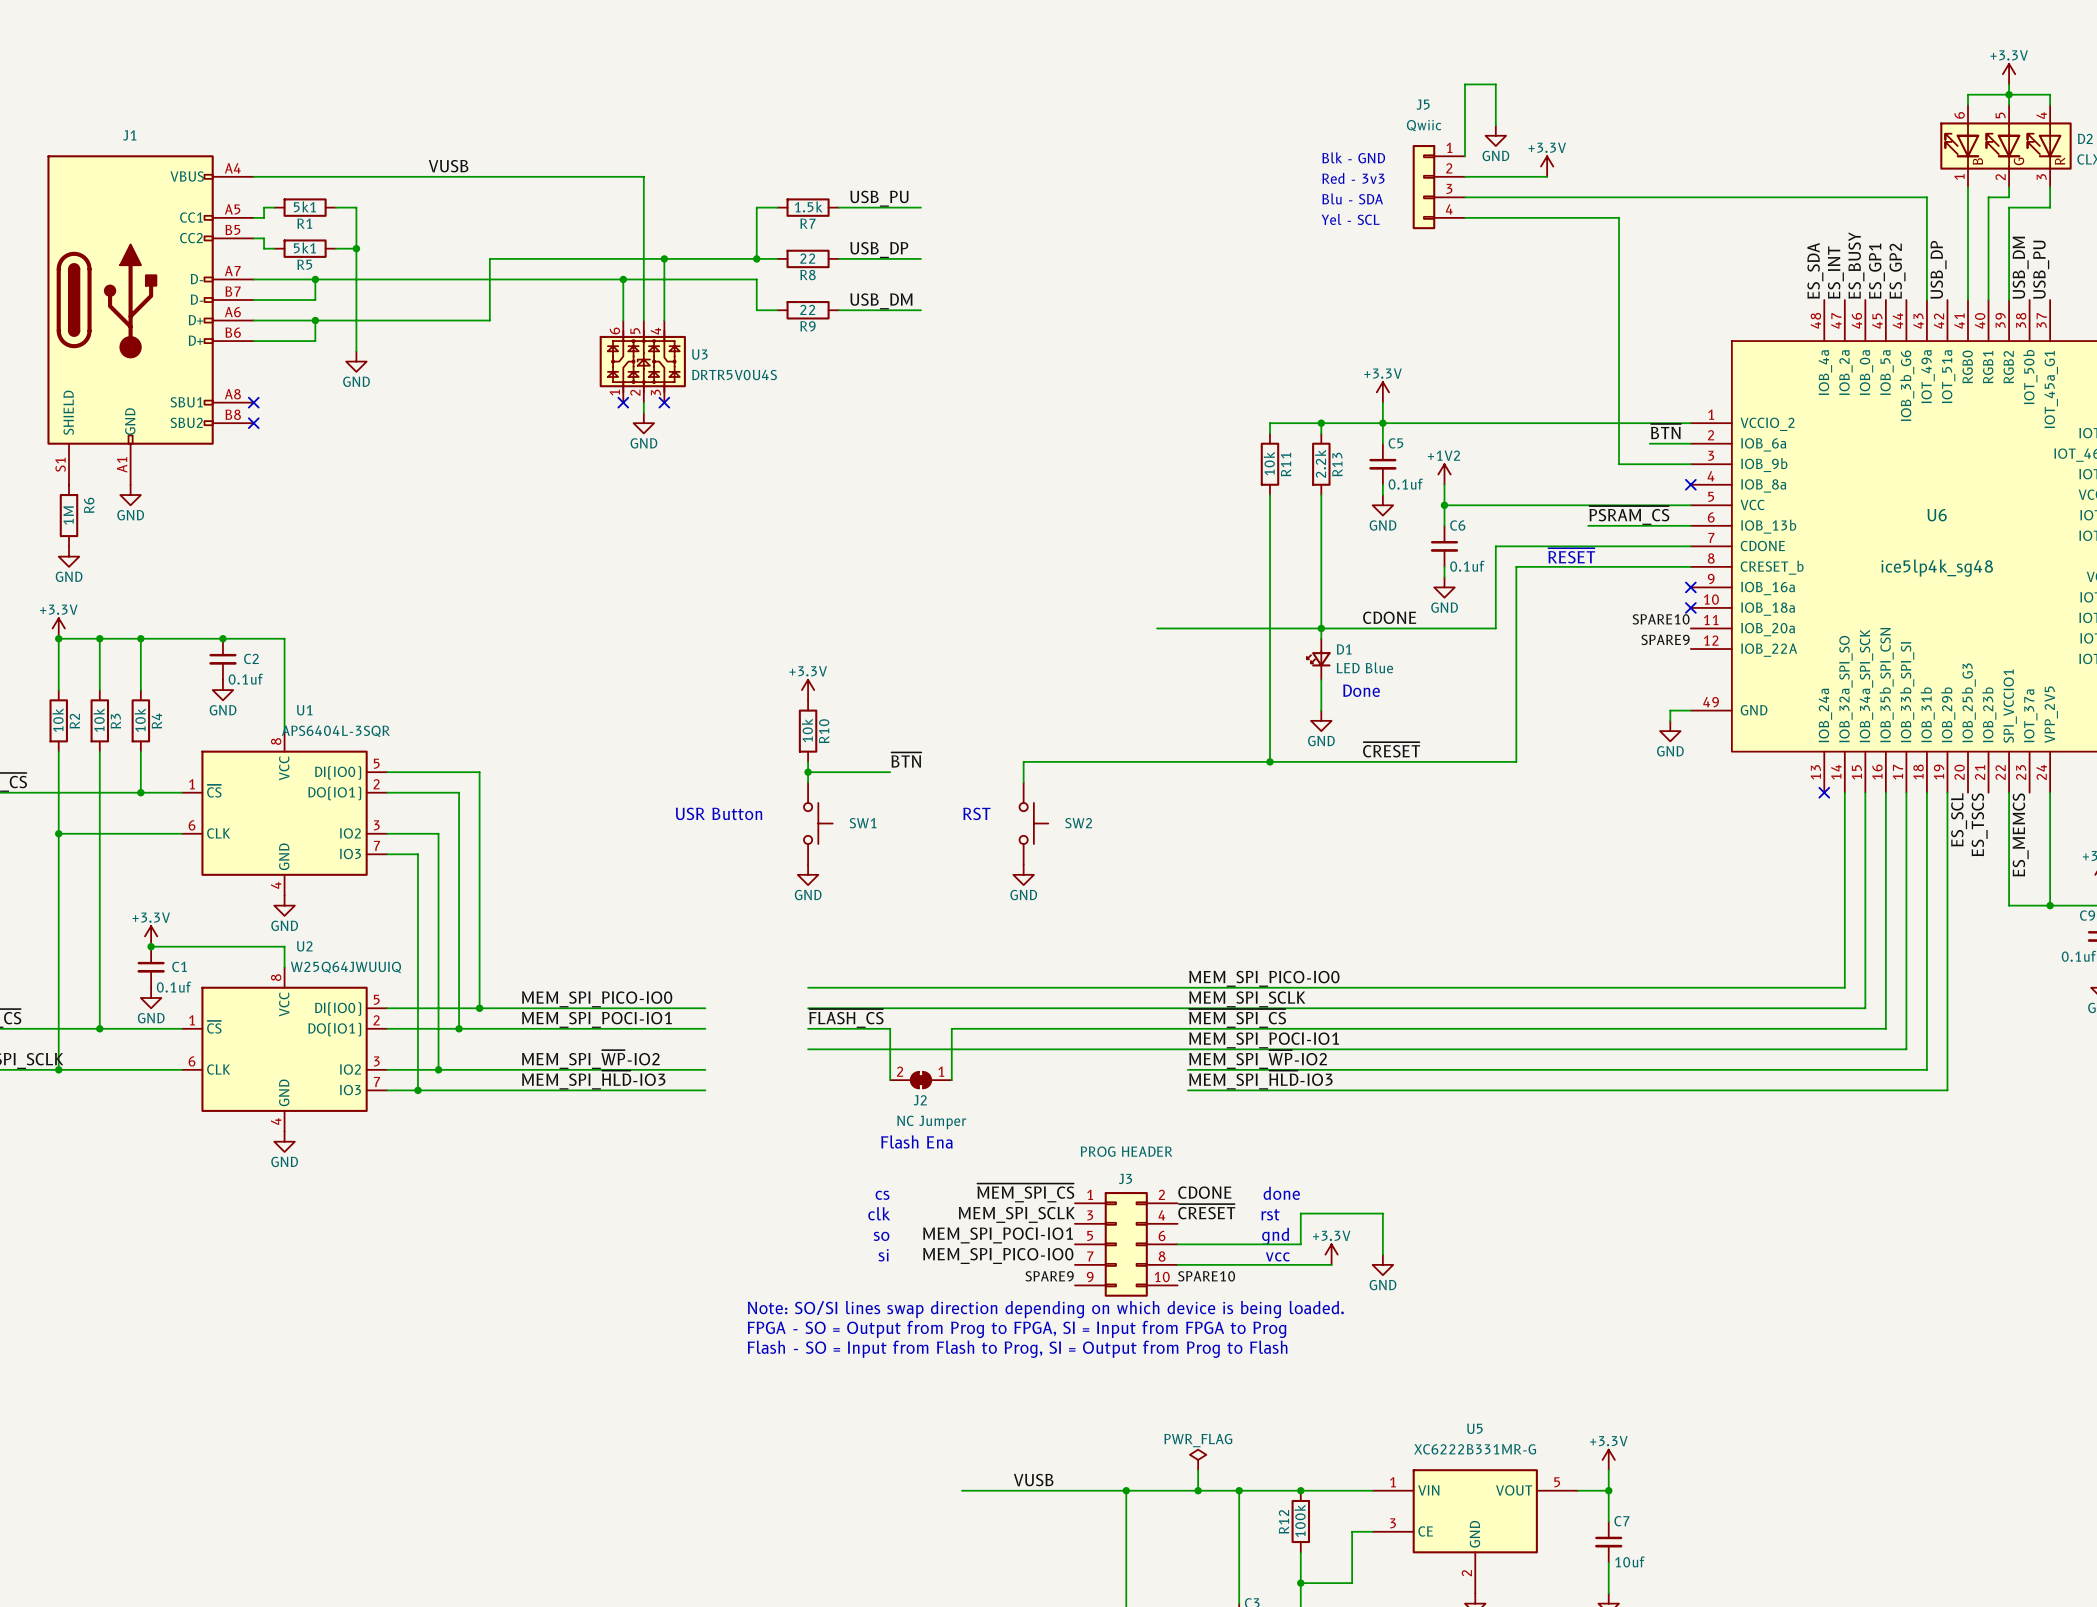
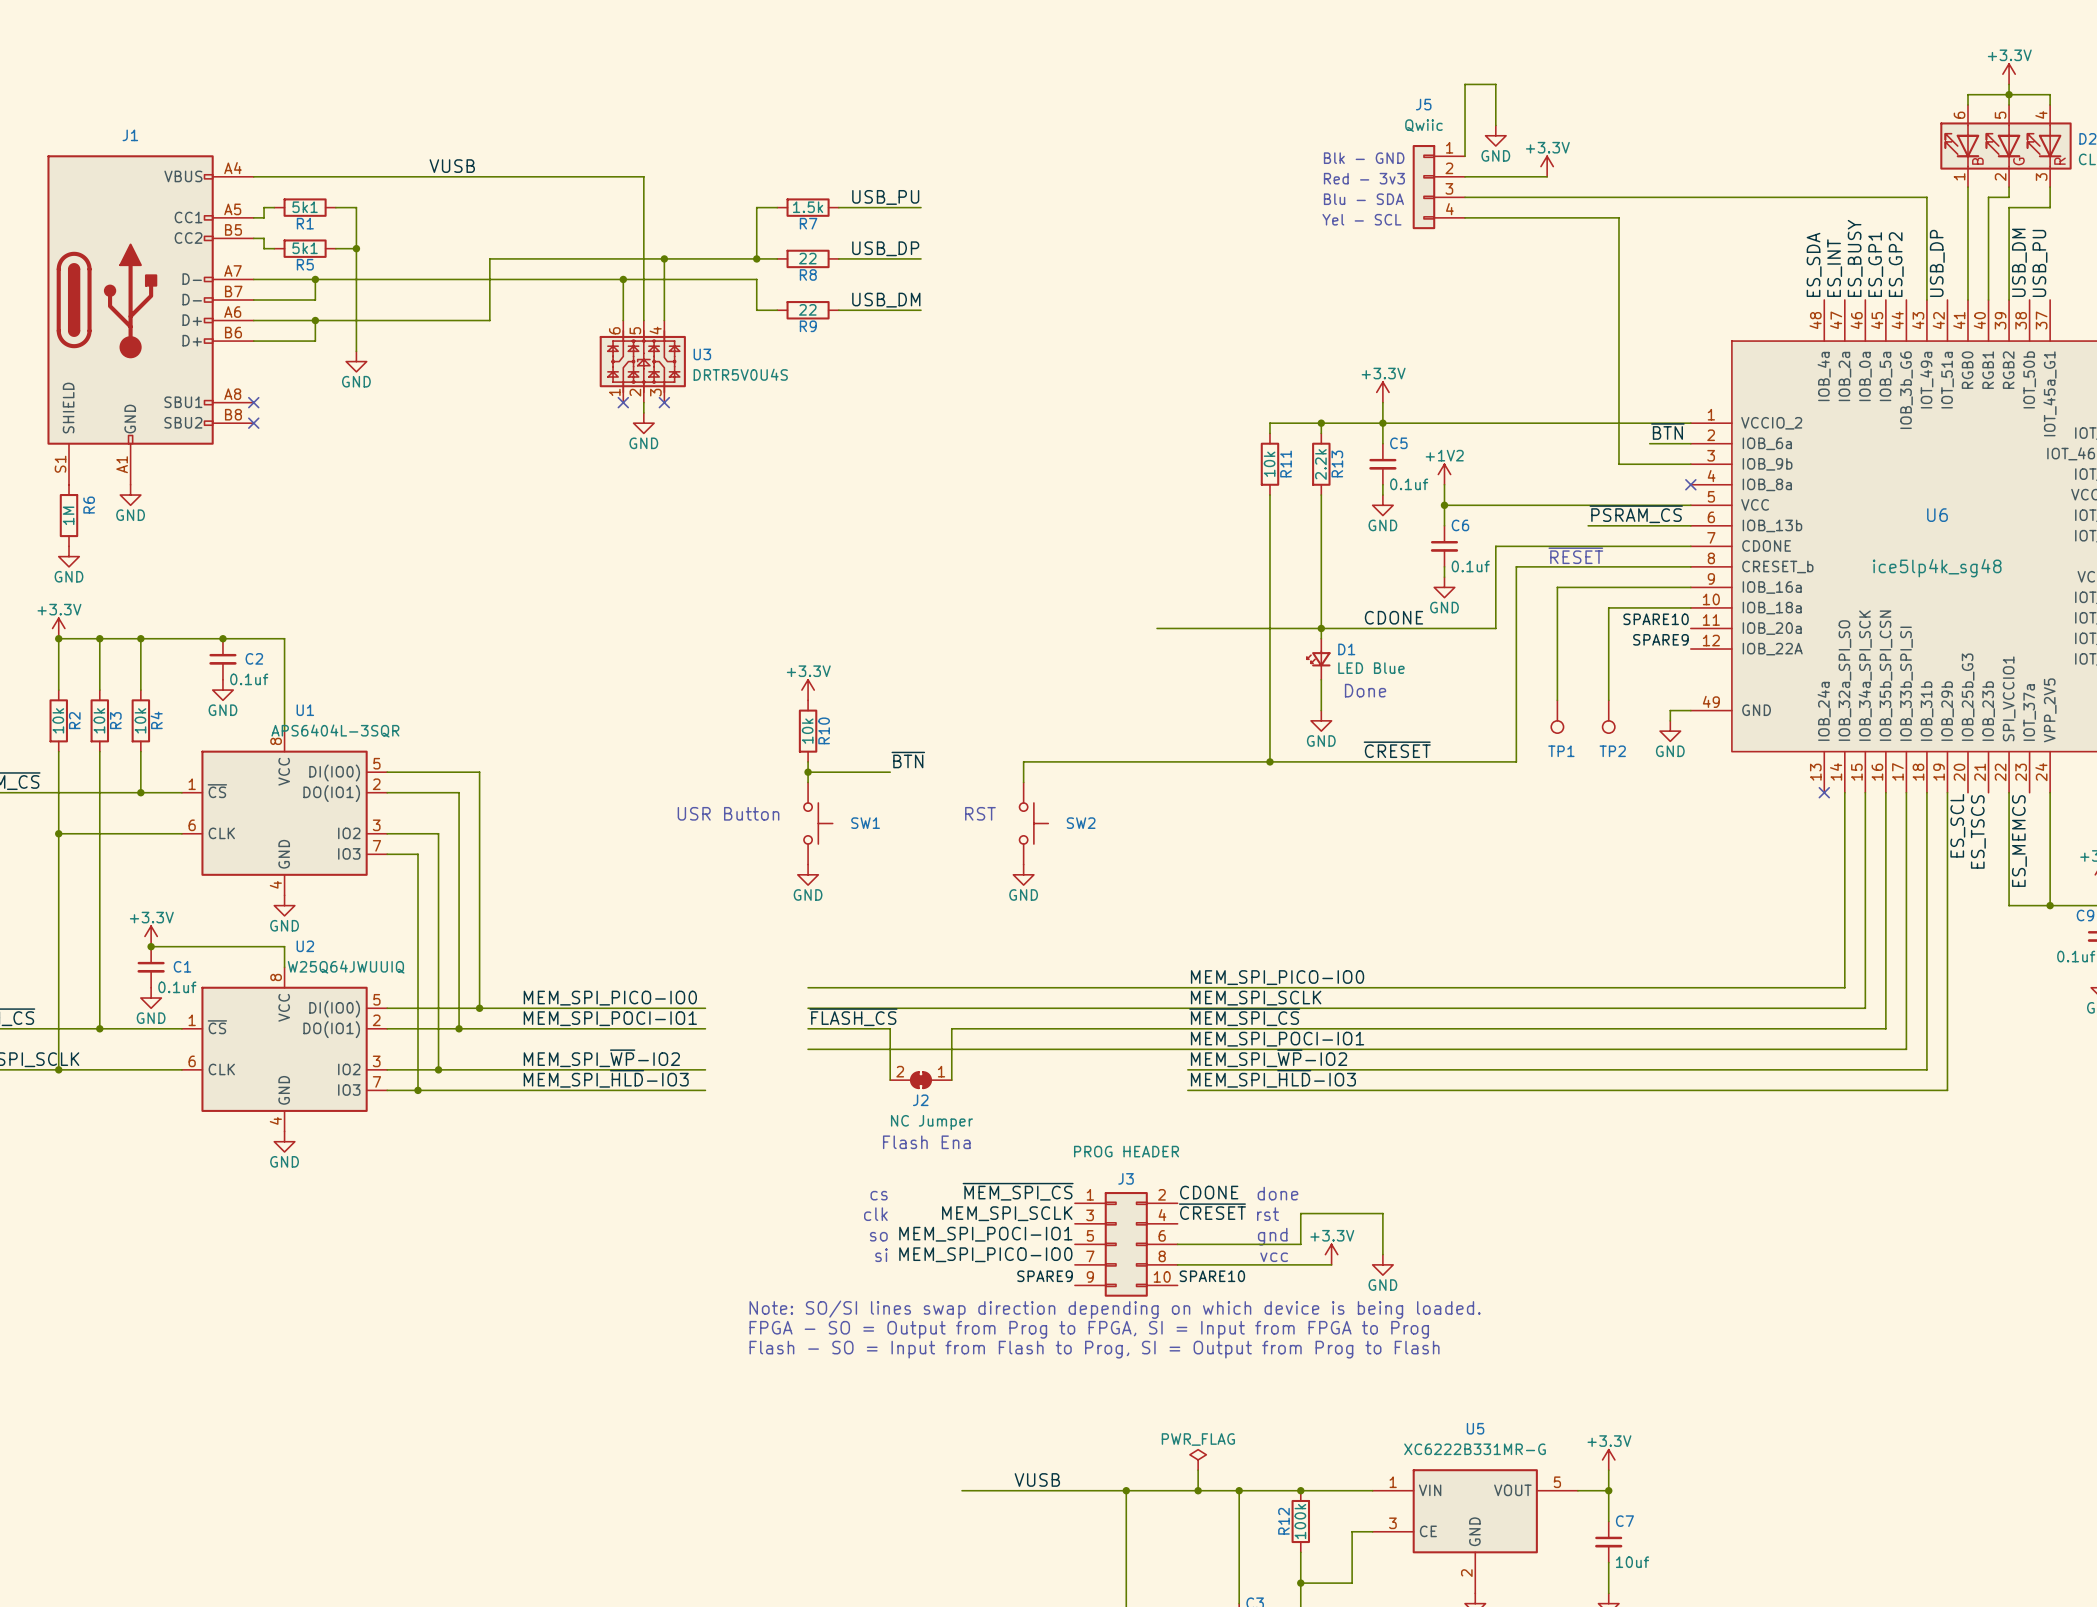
wire: none -> (1690, 587) (1557, 587) (1557, 700)
no-connect mark: (1690, 587) -> none
wire: none -> (1690, 607) (1608, 607) (1608, 700)
no-connect mark: (1690, 607) -> none
TP1: none -> (1557, 716)
TP2: none -> (1608, 716)

